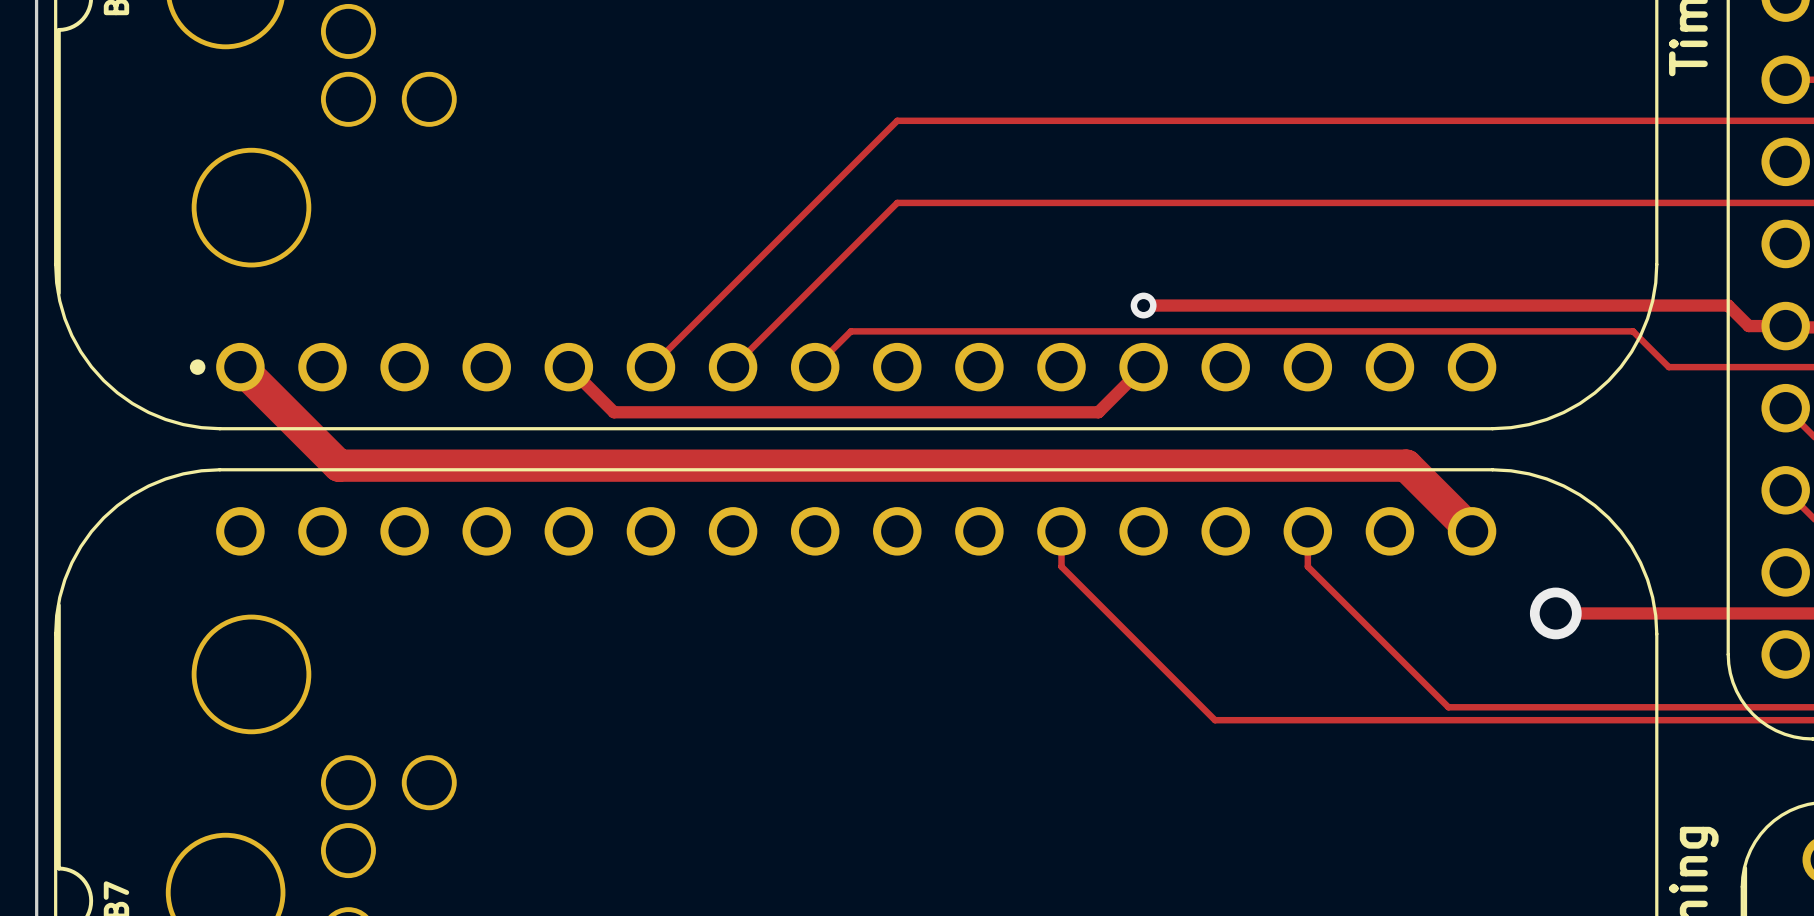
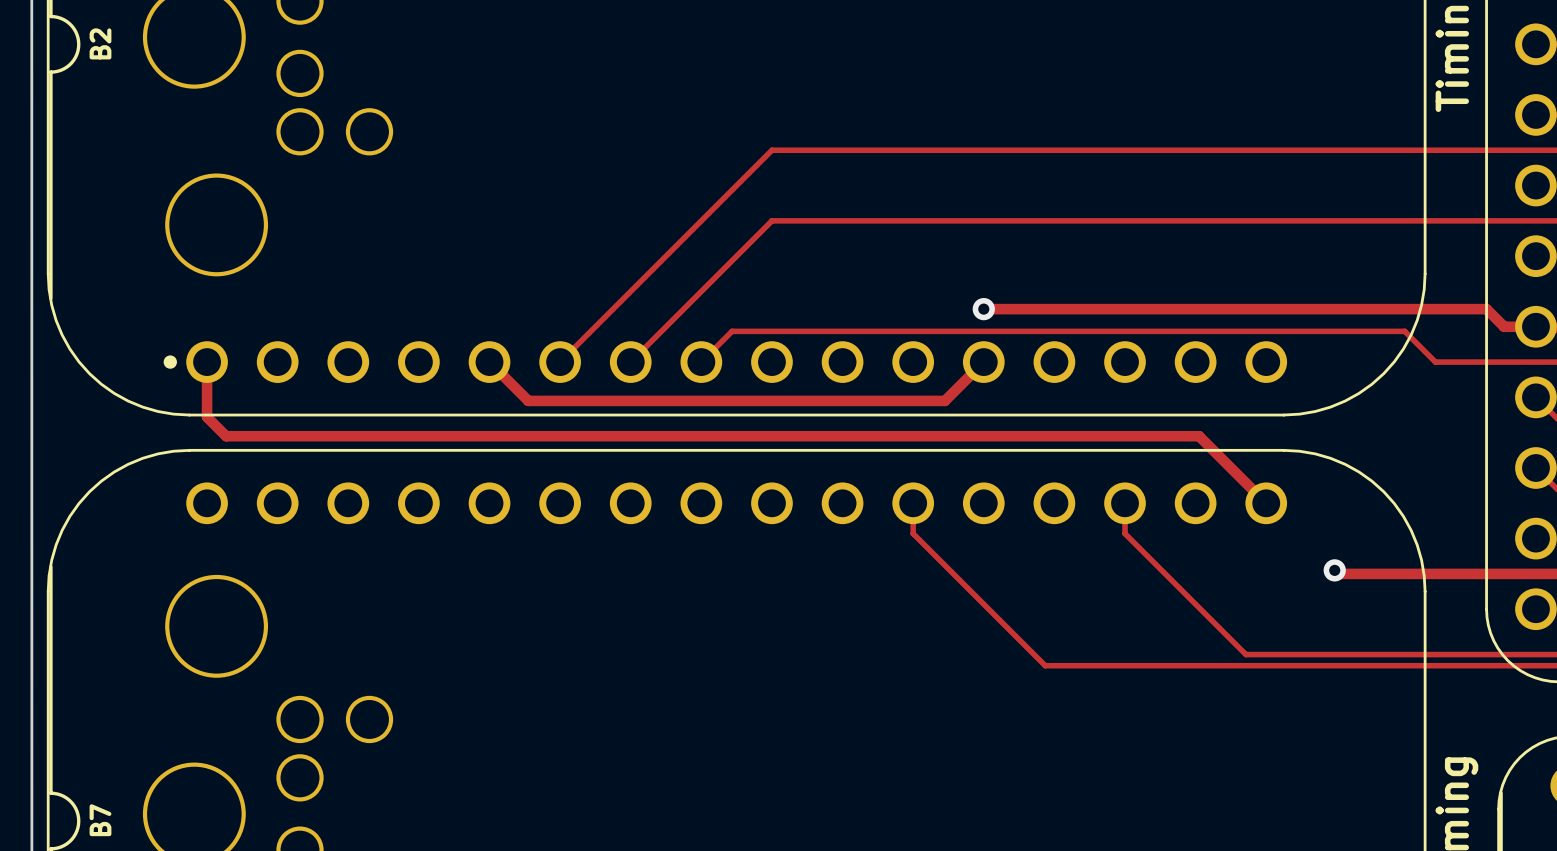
track: (240, 367) (338, 465) (1406, 465) -> (207, 362) (207, 417) (226, 436) (1199, 436) (1209, 446)
track width: thick (1406, 465) (1472, 531) -> thin (1209, 446) (1266, 503)
via size: [1529, 587, 1582, 640] -> [1323, 559, 1346, 582]

